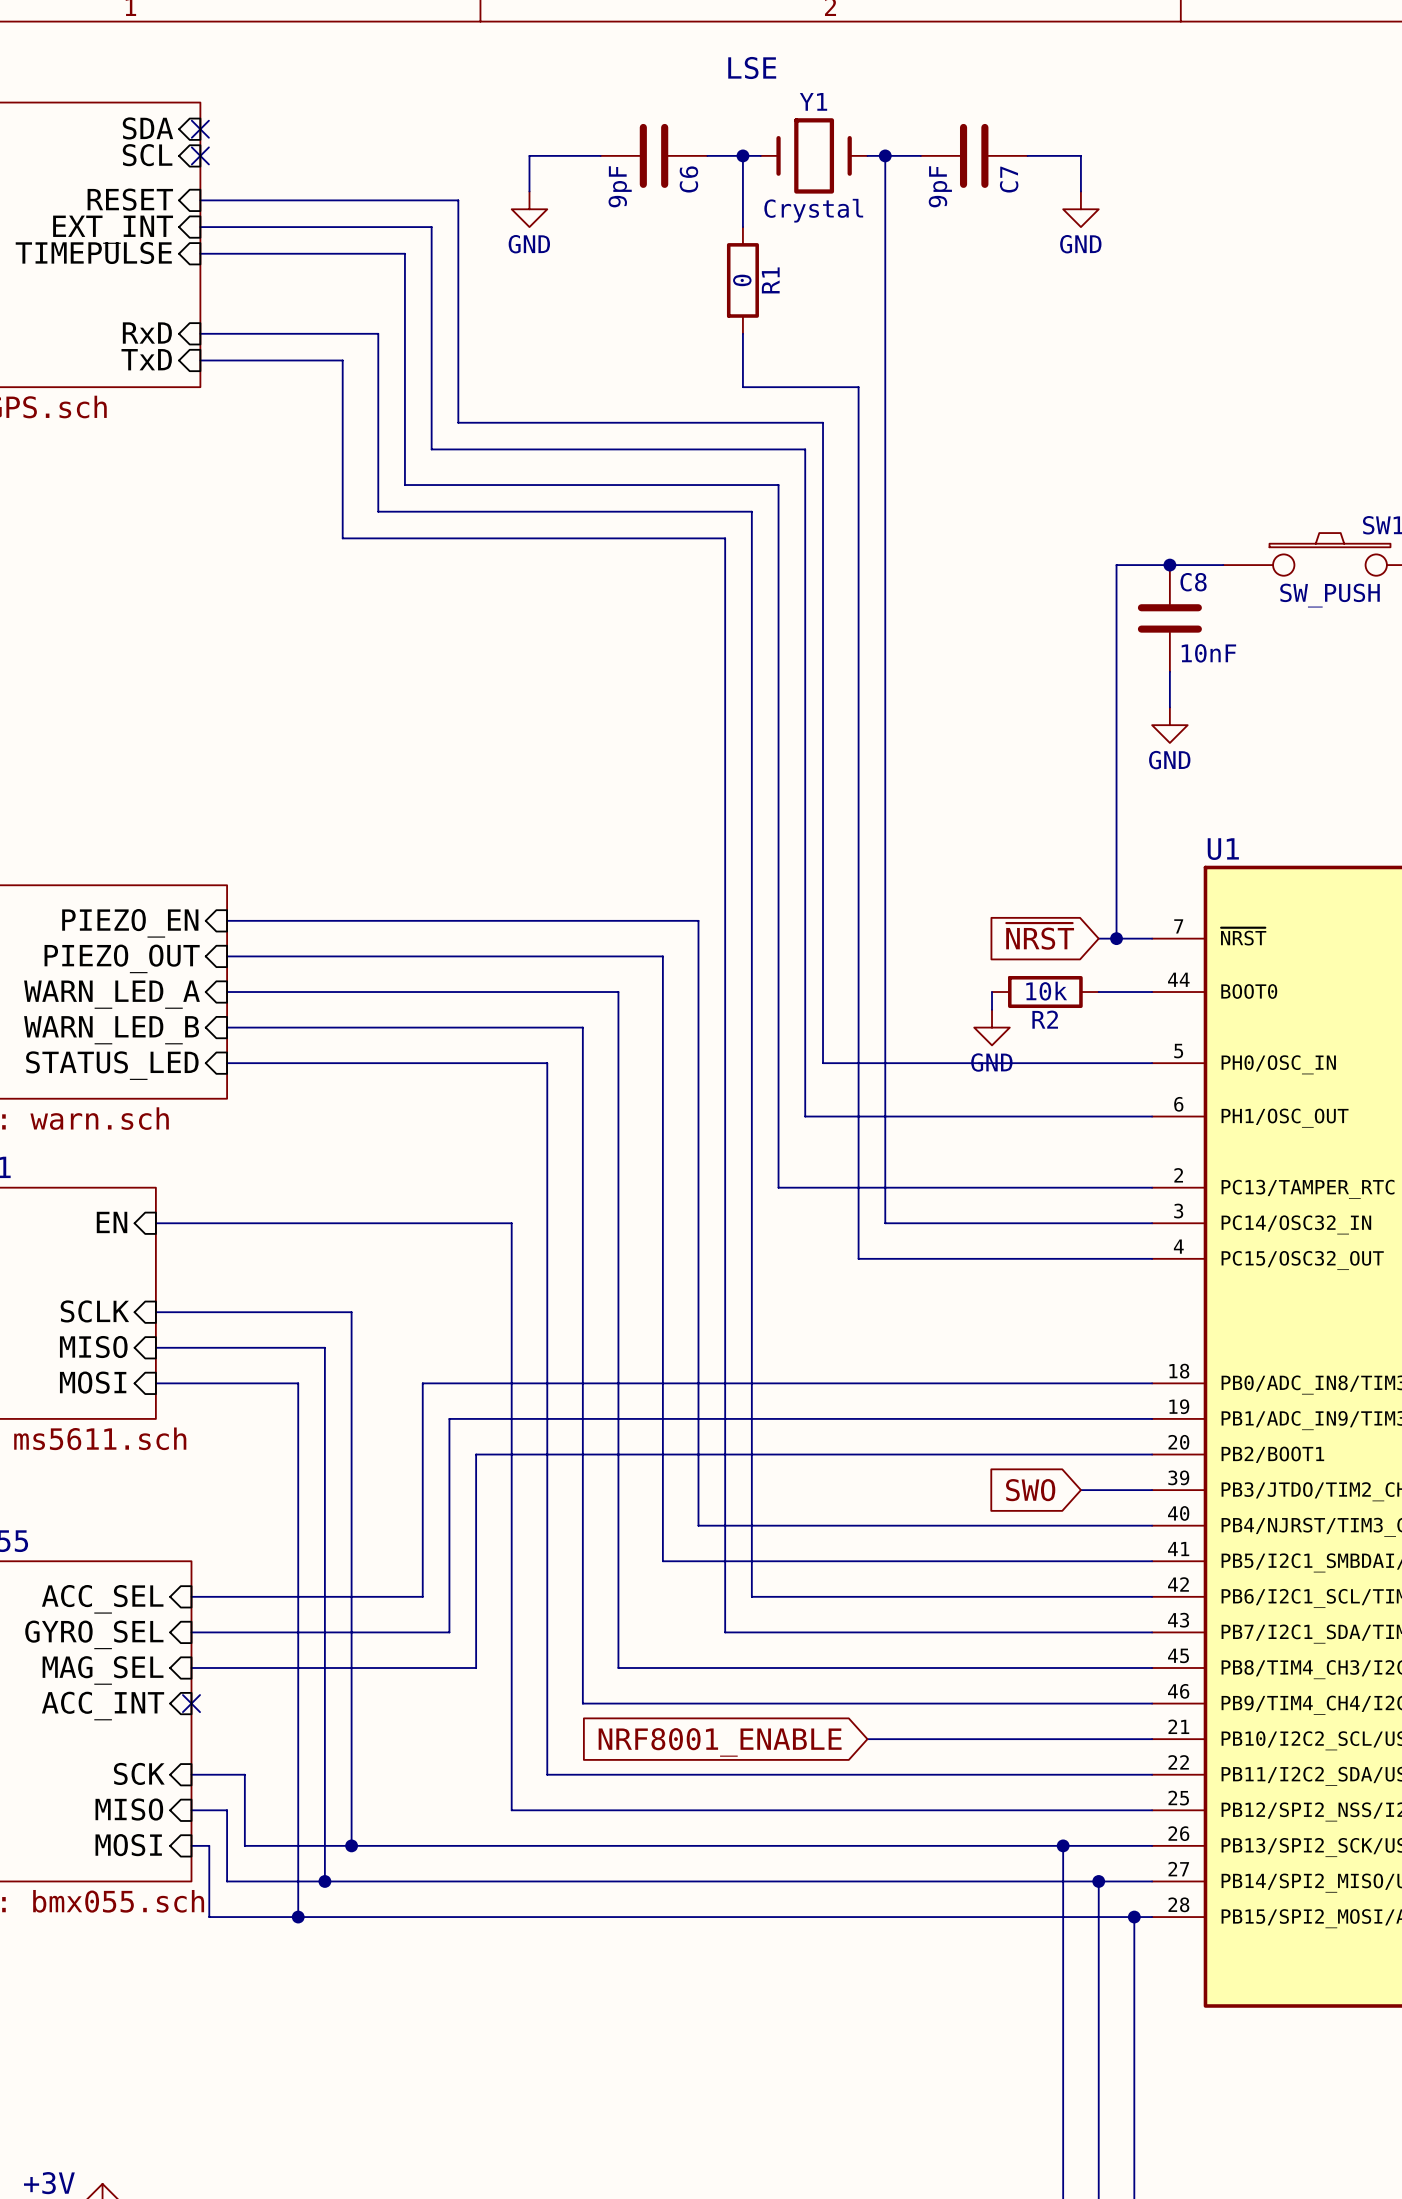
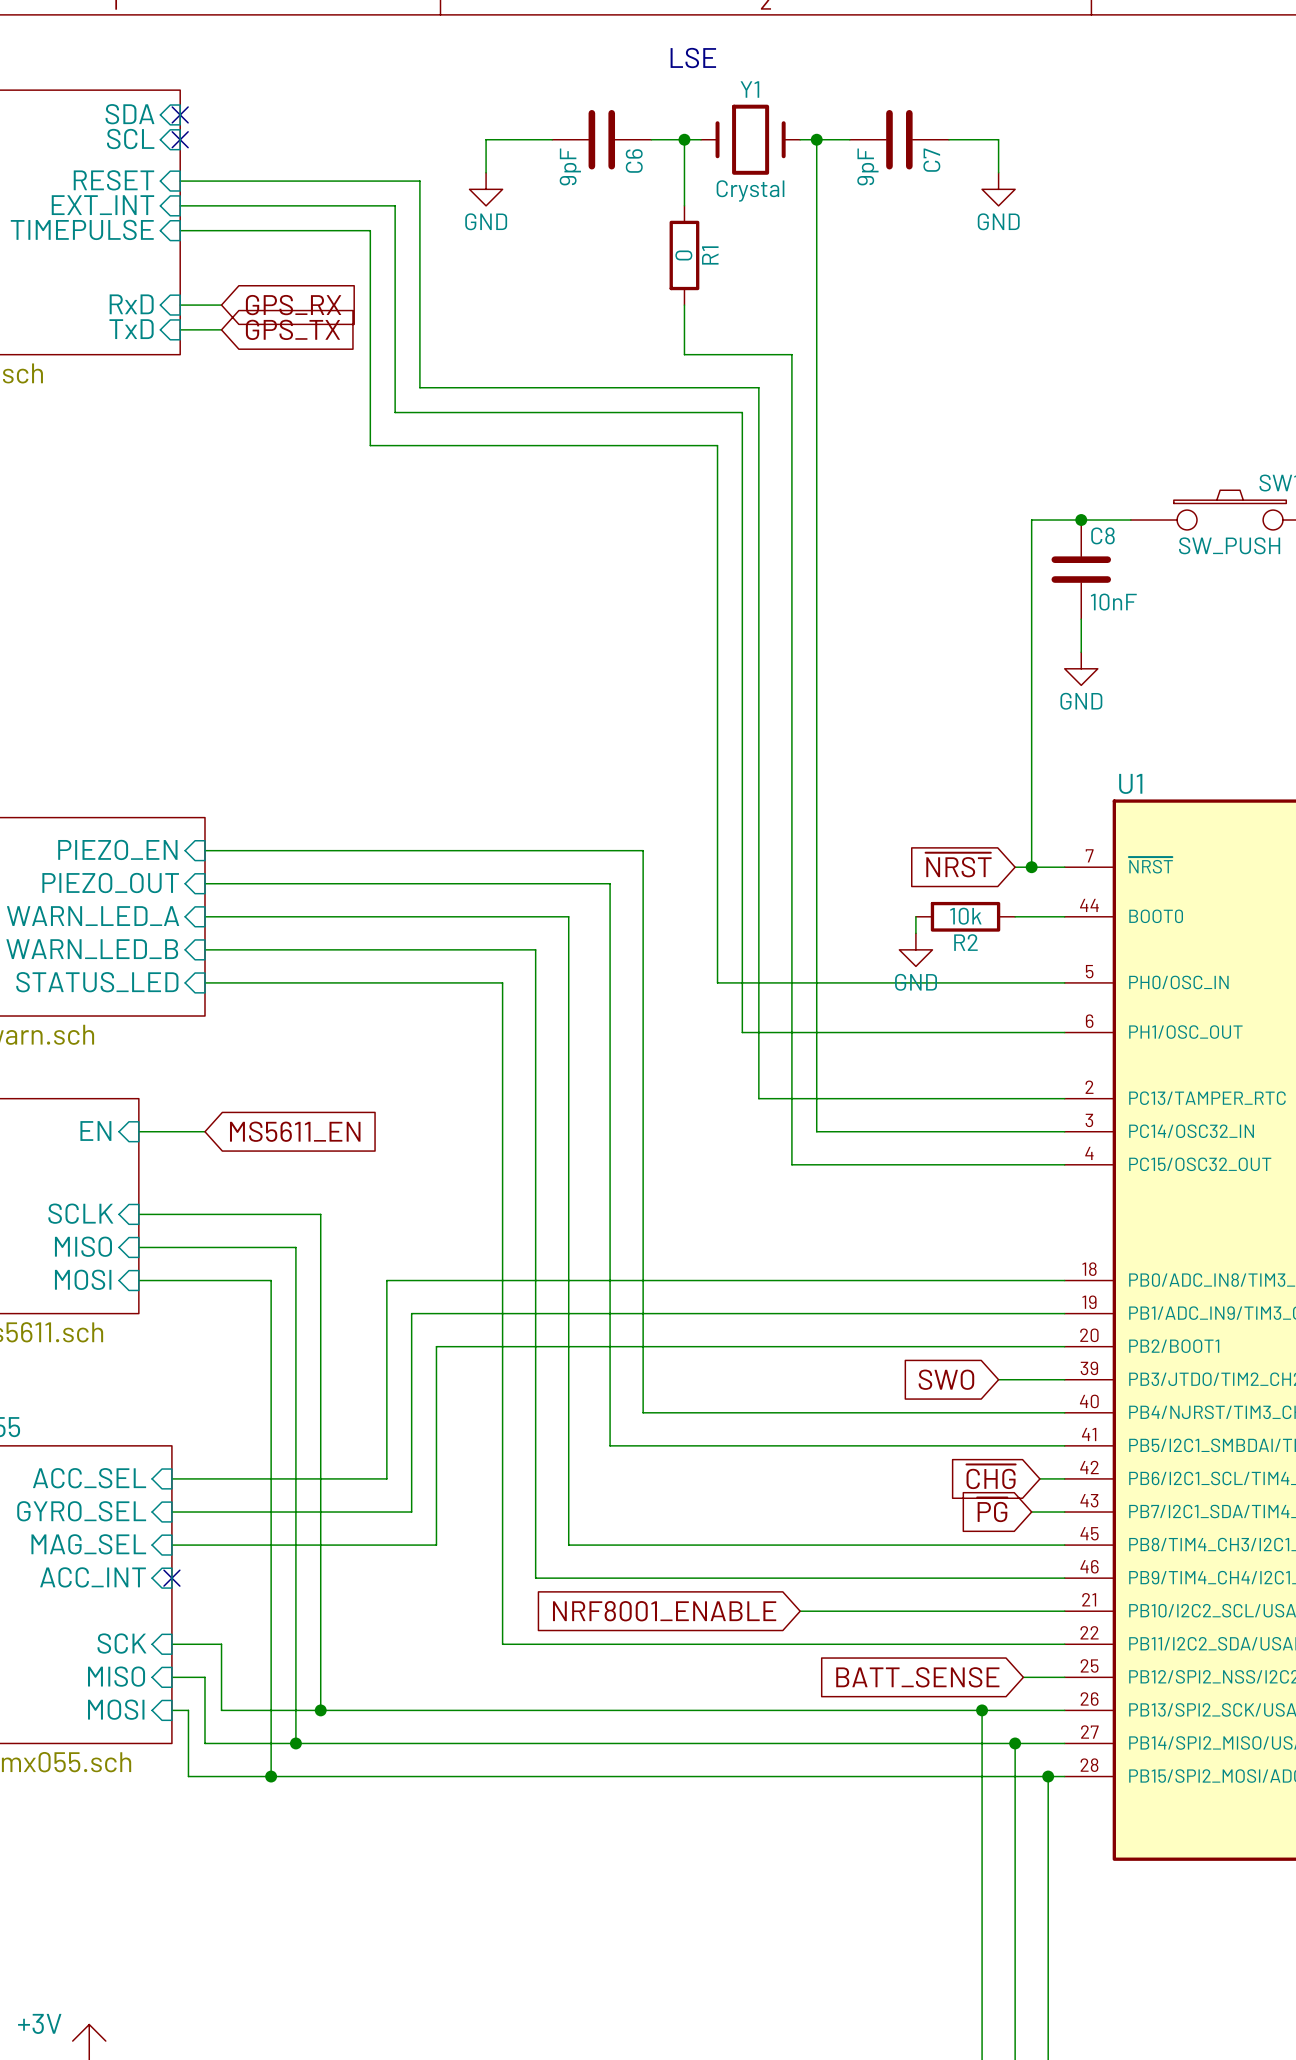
wire: (244, 333) (378, 333) (378, 511) (751, 511) (751, 1596) (1125, 1596) -> none
global label: none -> GPS_RX (293, 305)
wire: (244, 360) (342, 360) (342, 538) (725, 538) (725, 1632) (1116, 1632) -> none
global label: none -> GPS_TX (292, 329)
wire: (778, 1063) (778, 1187) (823, 1187) -> (717, 982) (758, 982) (758, 1098)
wire: (227, 1223) (511, 1223) (511, 1810) (1107, 1810) -> none
global label: none -> MS5611_EN (295, 1131)
global label: none -> ~{CHG} (991, 1476)
global label: none -> ~{PG} (992, 1509)
global label: none -> BATT_SENSE (917, 1677)

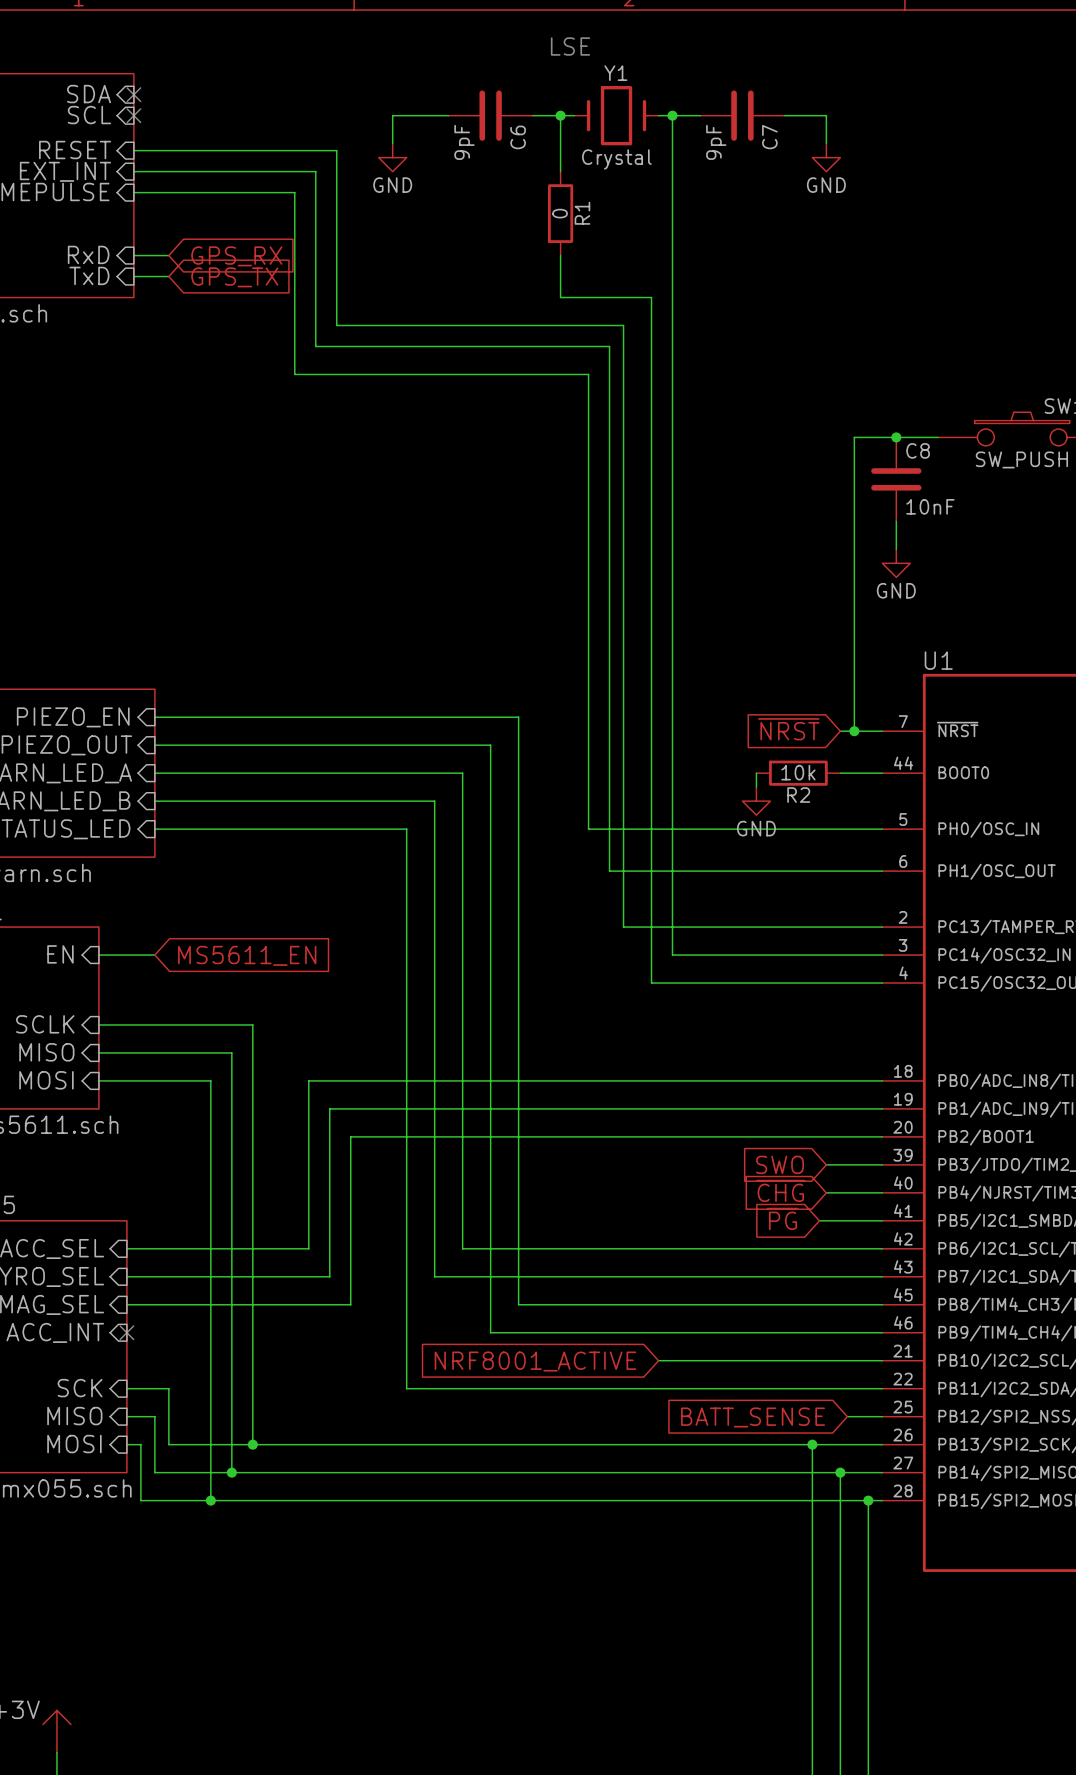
wire: (634, 850) (643, 850) (643, 1412) (998, 1412) -> (518, 717) (518, 1304)
wire: (601, 883) (610, 883) (610, 1445) (990, 1445) -> (490, 745) (490, 1332)
global label position: ~{CHG} (991, 1476) -> ~{CHG} (780, 1190)
wire: (568, 1478) (568, 1545) (634, 1545) -> (462, 1248) (861, 1248)
global label position: ~{PG} (992, 1509) -> ~{PG} (782, 1218)
wire: (535, 1512) (535, 1578) (601, 1578) -> (434, 1276) (854, 1276)
global label: NRF8001_ENABLE (664, 1611) -> NRF8001_ACTIVE (535, 1361)

